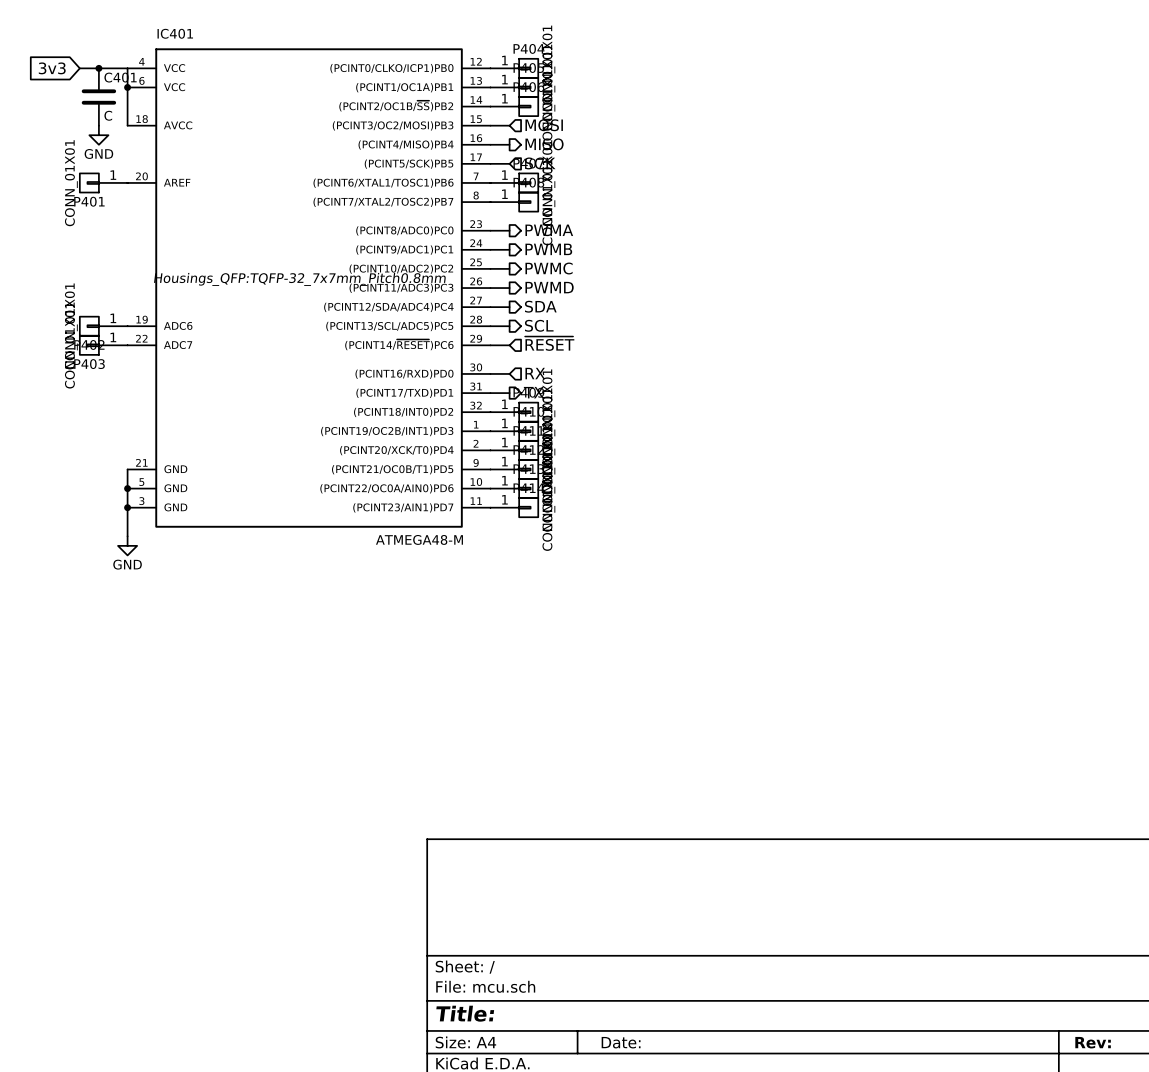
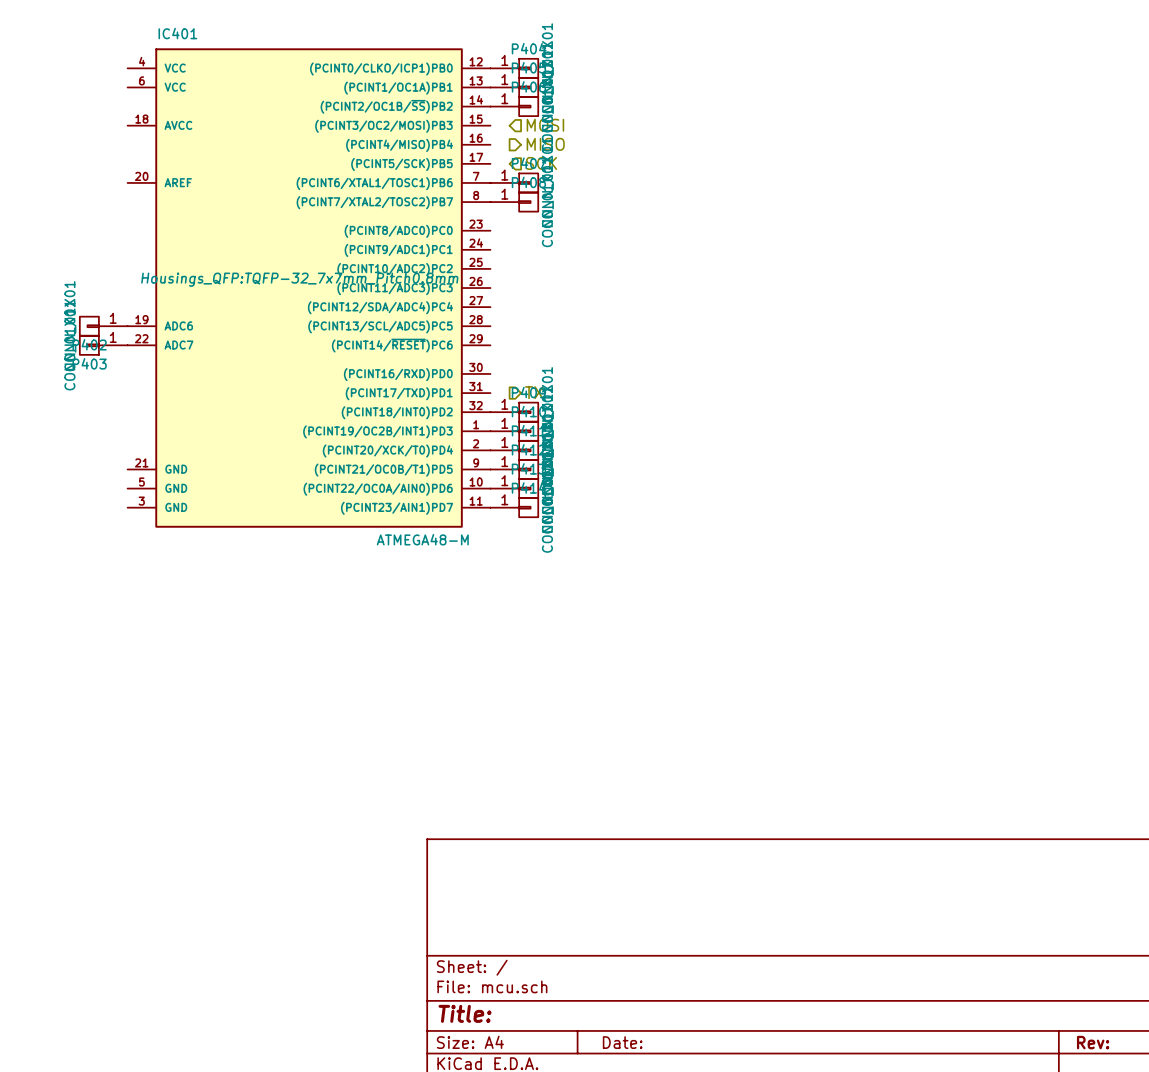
global label: 3v3 (52, 68) -> none
wire: (79, 68) (127, 68) (127, 125) -> none
junction: (98, 68) -> none
junction: (127, 87) -> none
C401: C (98, 97) -> none
wire: (490, 125) (509, 125) -> none
power symbol: GND (98, 135) -> none
wire: (490, 144) (509, 144) -> none
wire: (490, 163) (509, 163) -> none
P401: CONN_01X01 (103, 182) -> none
wire: (490, 230) (509, 230) -> none
hierarchical label: PWMA (549, 230) -> none
wire: (490, 249) (509, 249) -> none
hierarchical label: PWMB (548, 249) -> none
wire: (490, 268) (509, 268) -> none
hierarchical label: PWMC (549, 268) -> none
hierarchical label: PWMD (549, 287) -> none
wire: (490, 288) (509, 288) -> none
hierarchical label: SDA (540, 306) -> none
wire: (490, 307) (509, 307) -> none
hierarchical label: SCL (539, 325) -> none
wire: (490, 326) (509, 326) -> none
hierarchical label: ~{RESET} (549, 343) -> none
wire: (490, 345) (509, 345) -> none
wire: (490, 373) (509, 373) -> none
hierarchical label: RX (535, 373) -> none
wire: (490, 393) (509, 393) -> none
wire: (127, 469) (127, 536) -> none
junction: (127, 488) -> none
junction: (127, 507) -> none
power symbol: GND (127, 545) -> none

